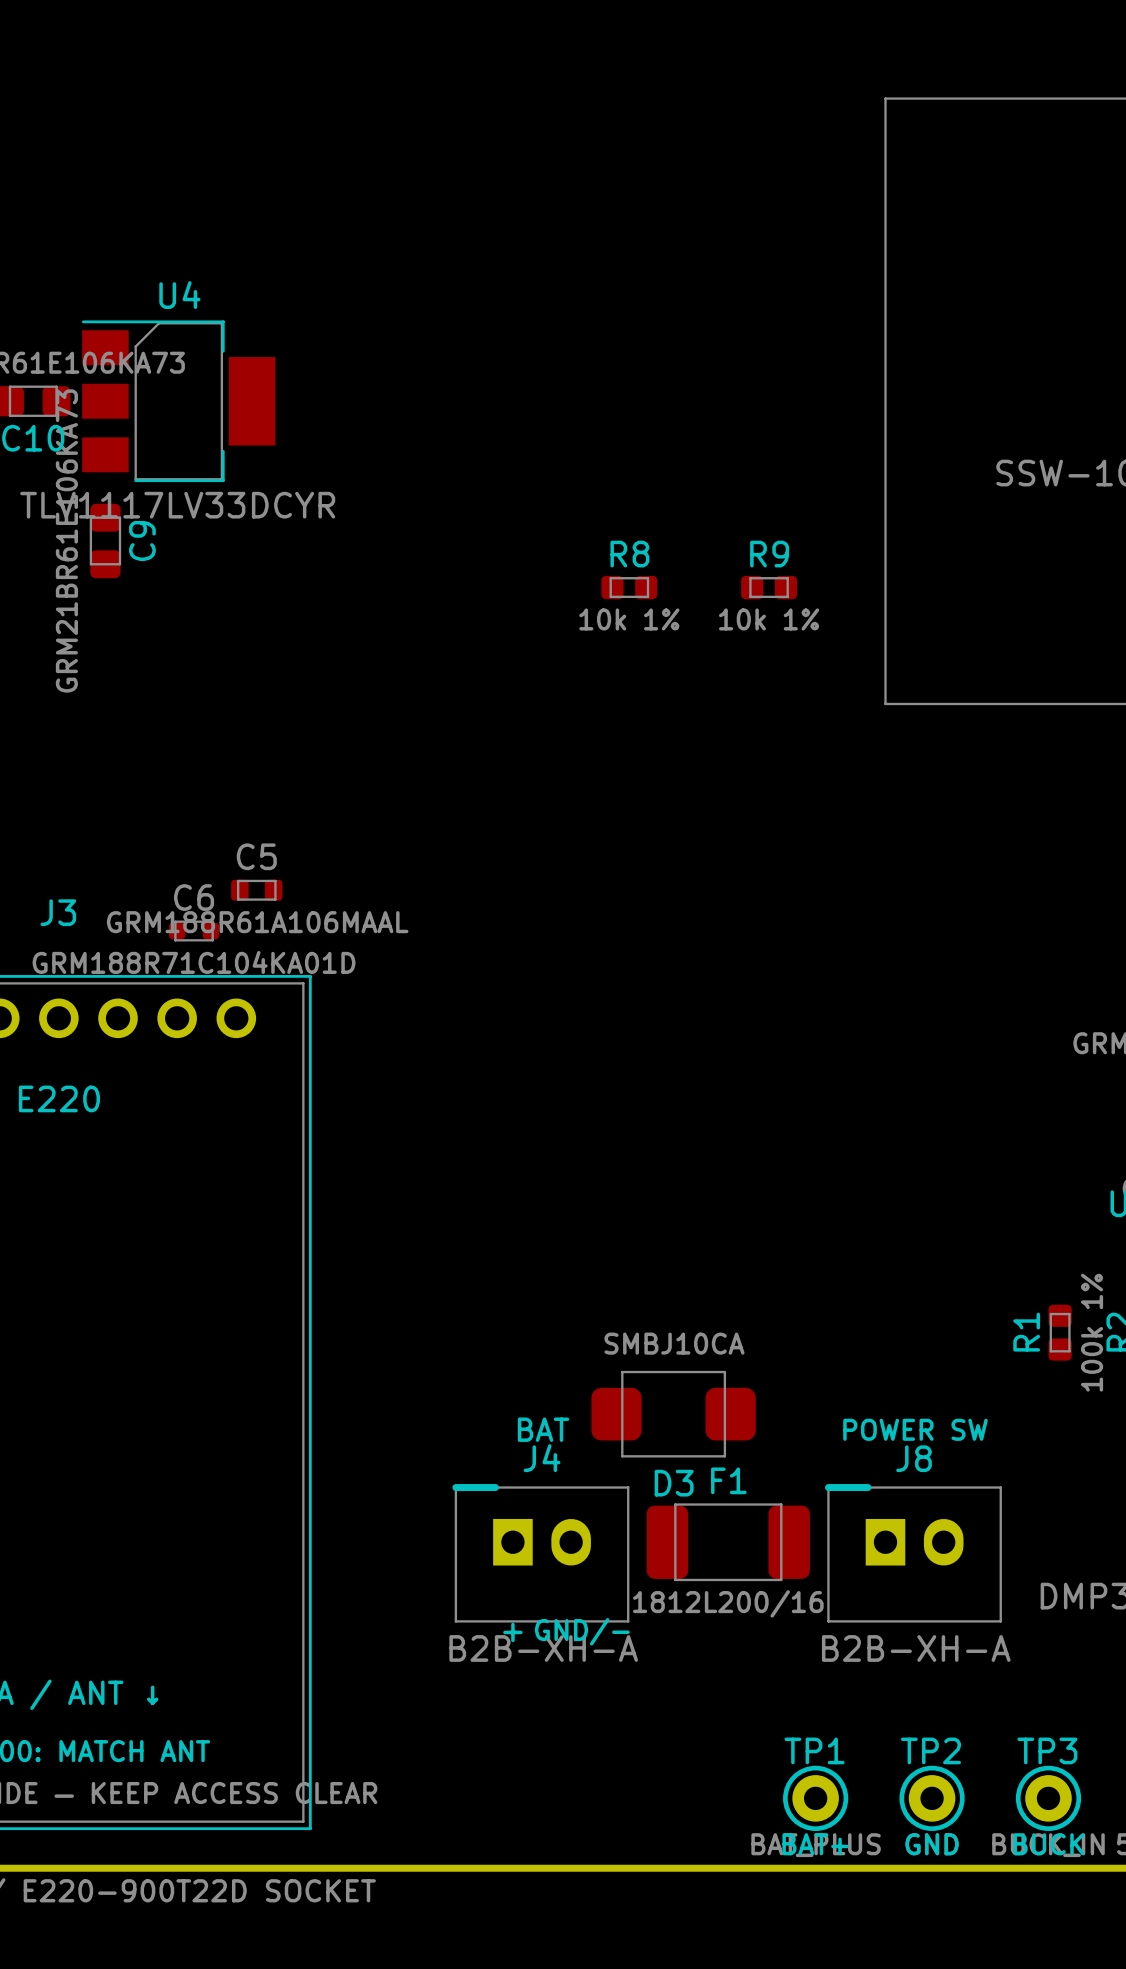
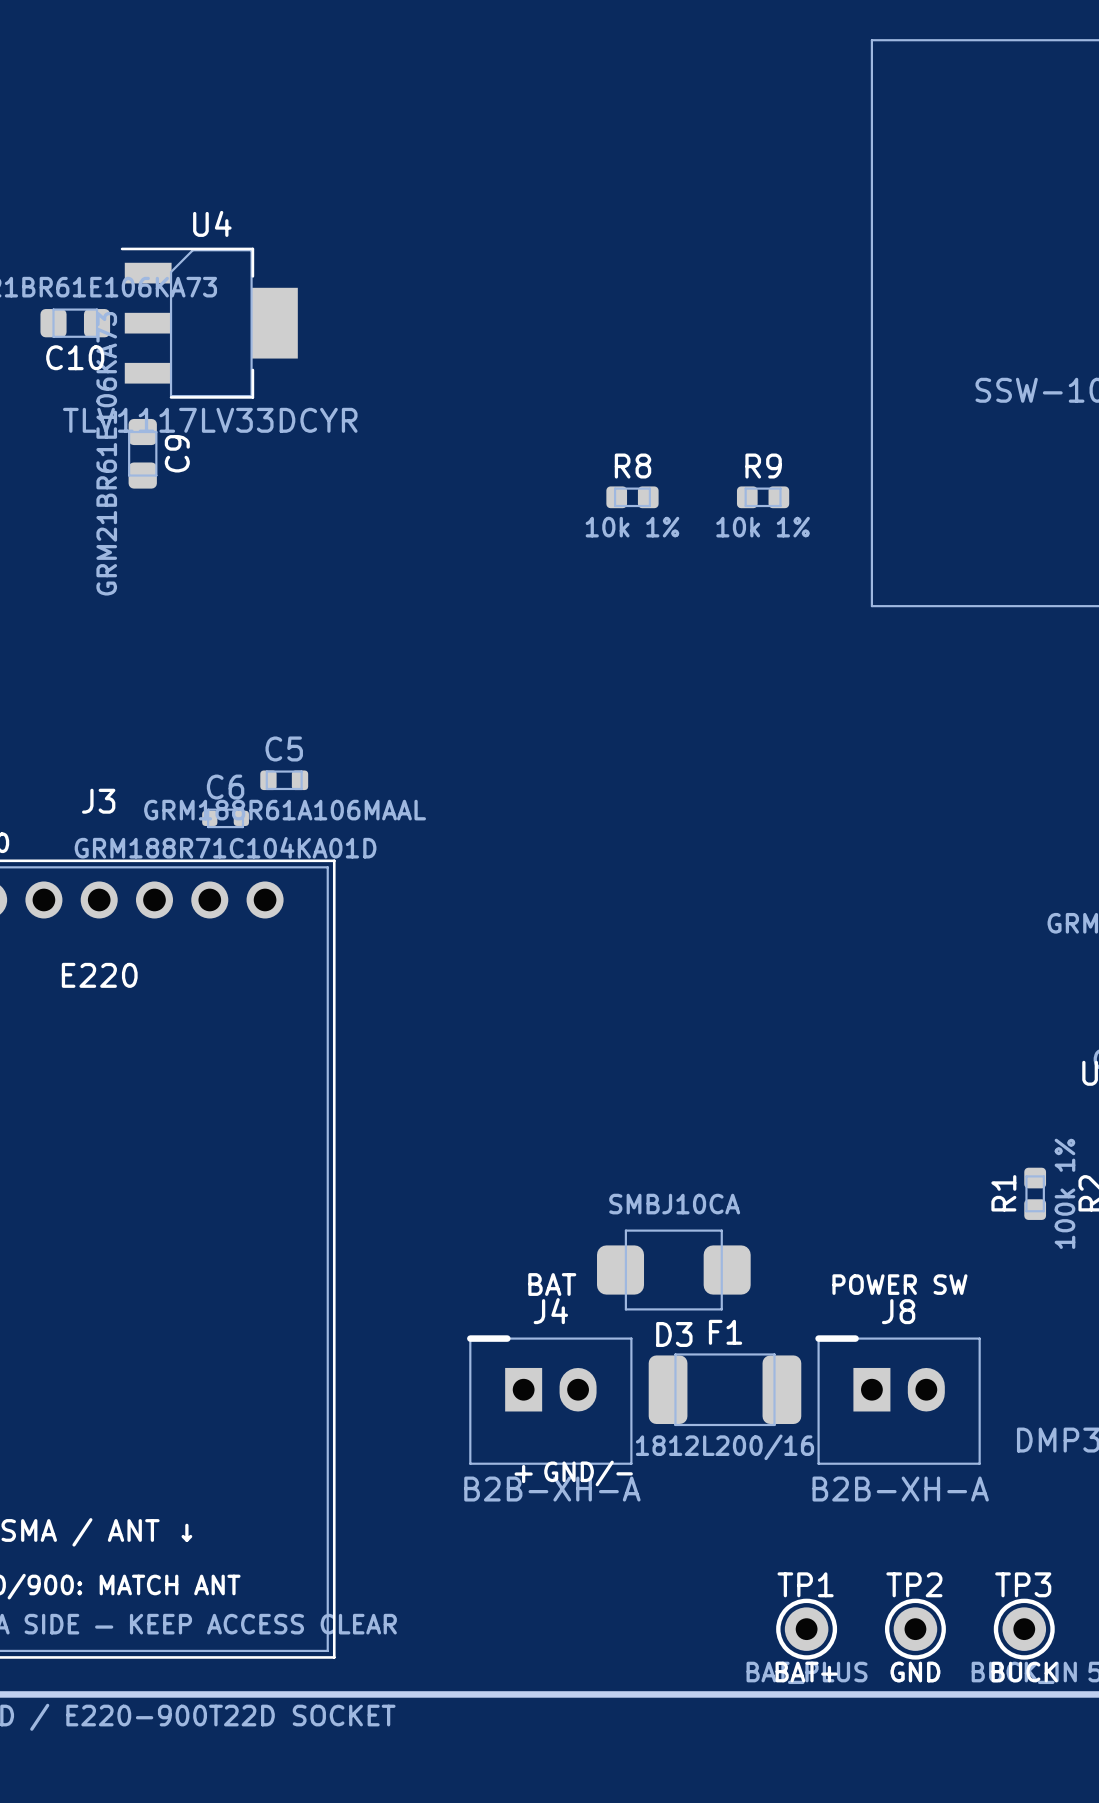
U4 footprint: [81, 320, 276, 483] -> [120, 247, 298, 399]

